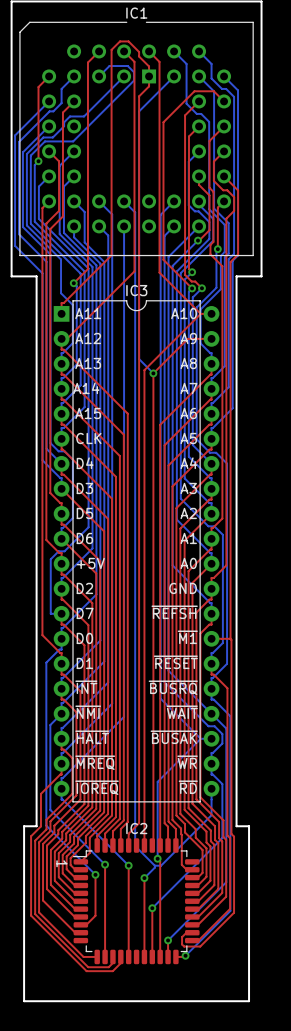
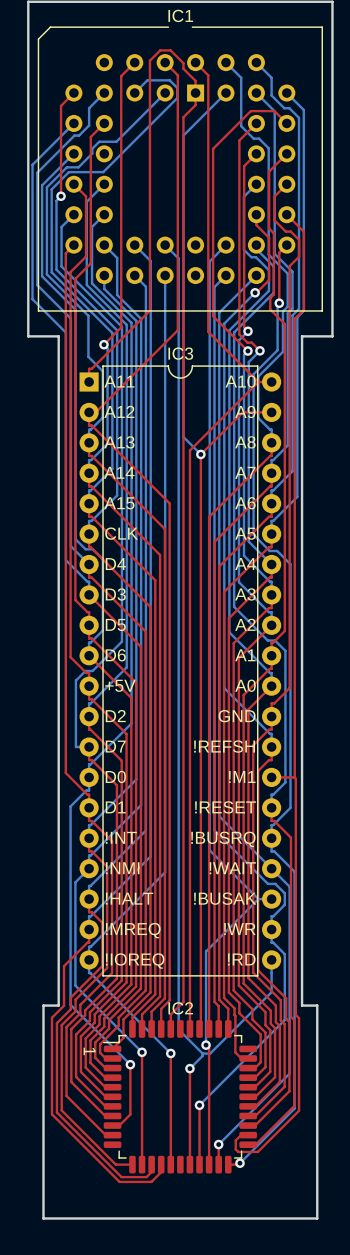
text: ~{REFSH} (174, 612) -> !REFSH (224, 746)
text: ~{M1} (187, 637) -> !M1 (242, 776)
text: ~{RESET} (175, 662) -> !RESET (225, 807)
text: ~{INT} (86, 687) -> !INT (121, 837)
text: ~{BUSRQ} (173, 687) -> !BUSRQ (223, 839)
text: ~{NMI} (88, 712) -> !NMI (122, 868)
text: ~{WAIT} (182, 712) -> !WAIT (232, 868)
text: ~{HALT} (92, 737) -> !HALT (129, 898)
text: ~{BUSAK} (174, 737) -> !BUSAK (225, 898)
text: ~{MREQ} (95, 762) -> !MREQ (133, 930)
text: ~{WR} (187, 762) -> !WR (239, 929)
text: ~{IOREQ} (97, 787) -> !IOREQ (135, 961)
text: ~{RD} (188, 787) -> !RD (241, 959)

